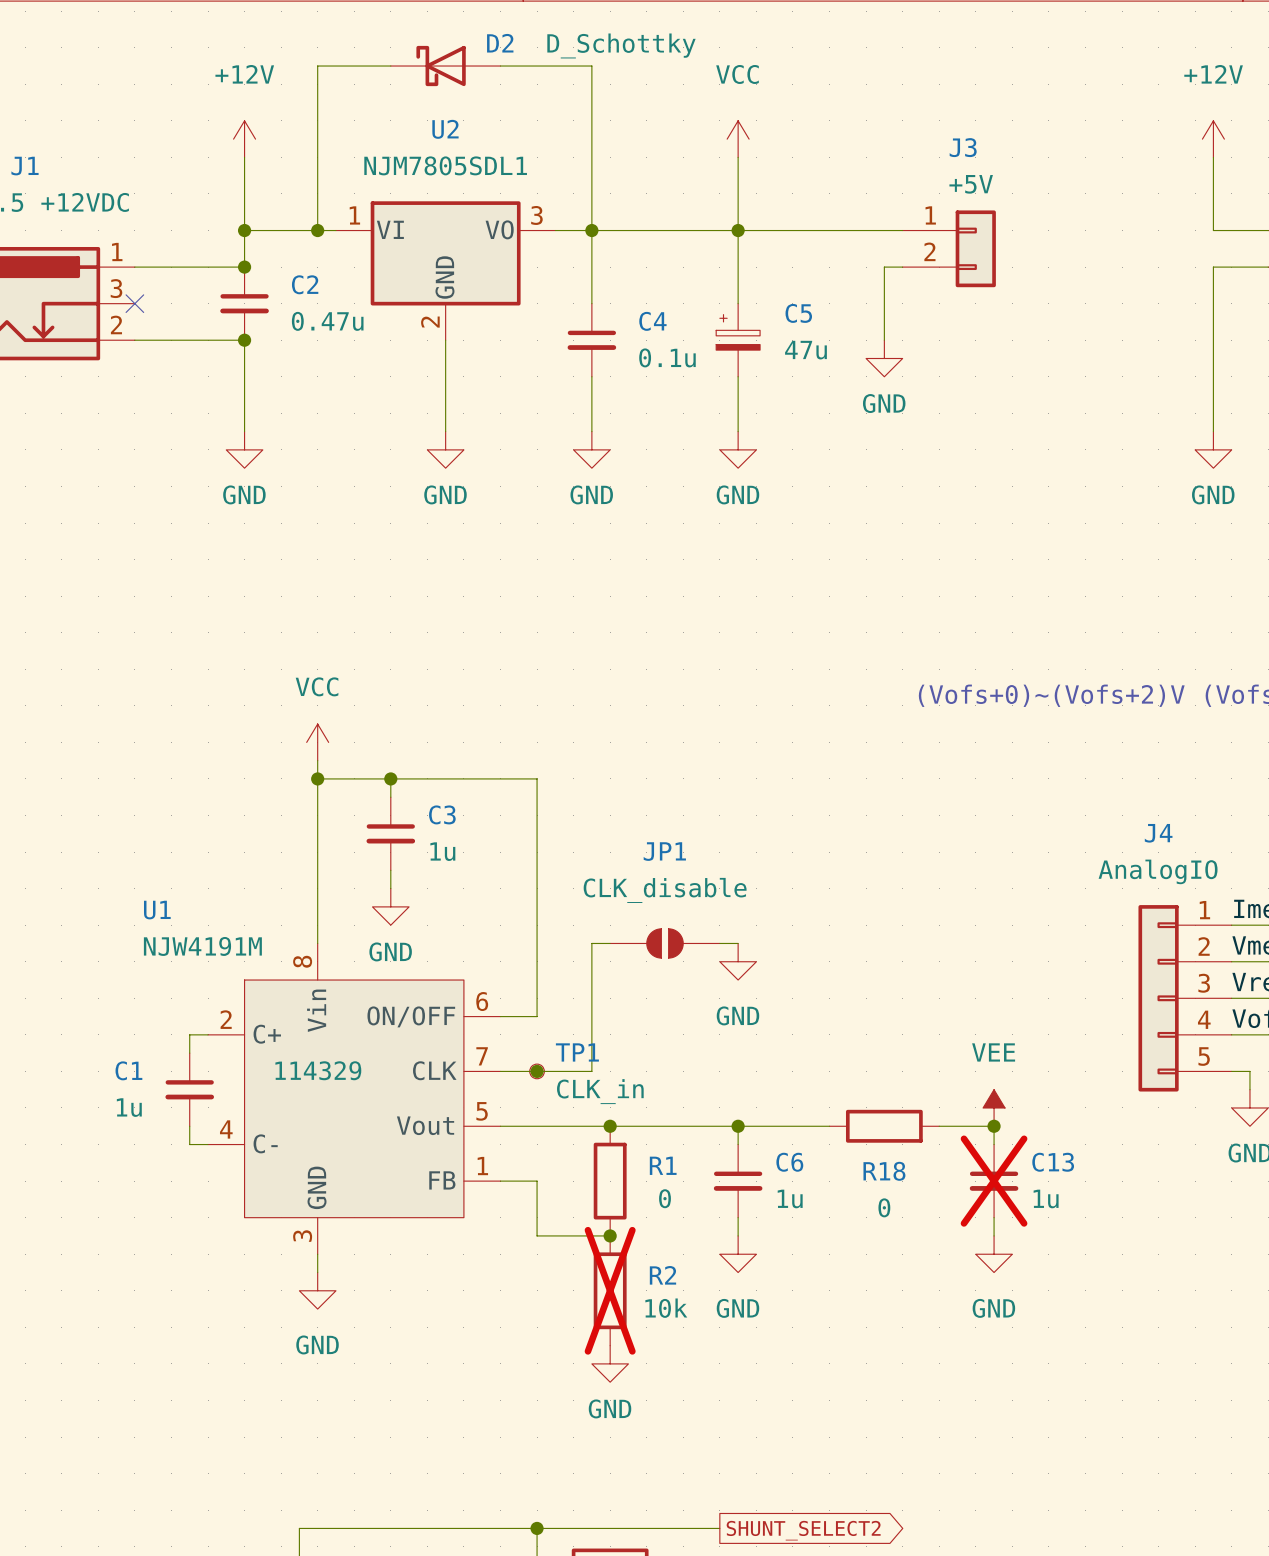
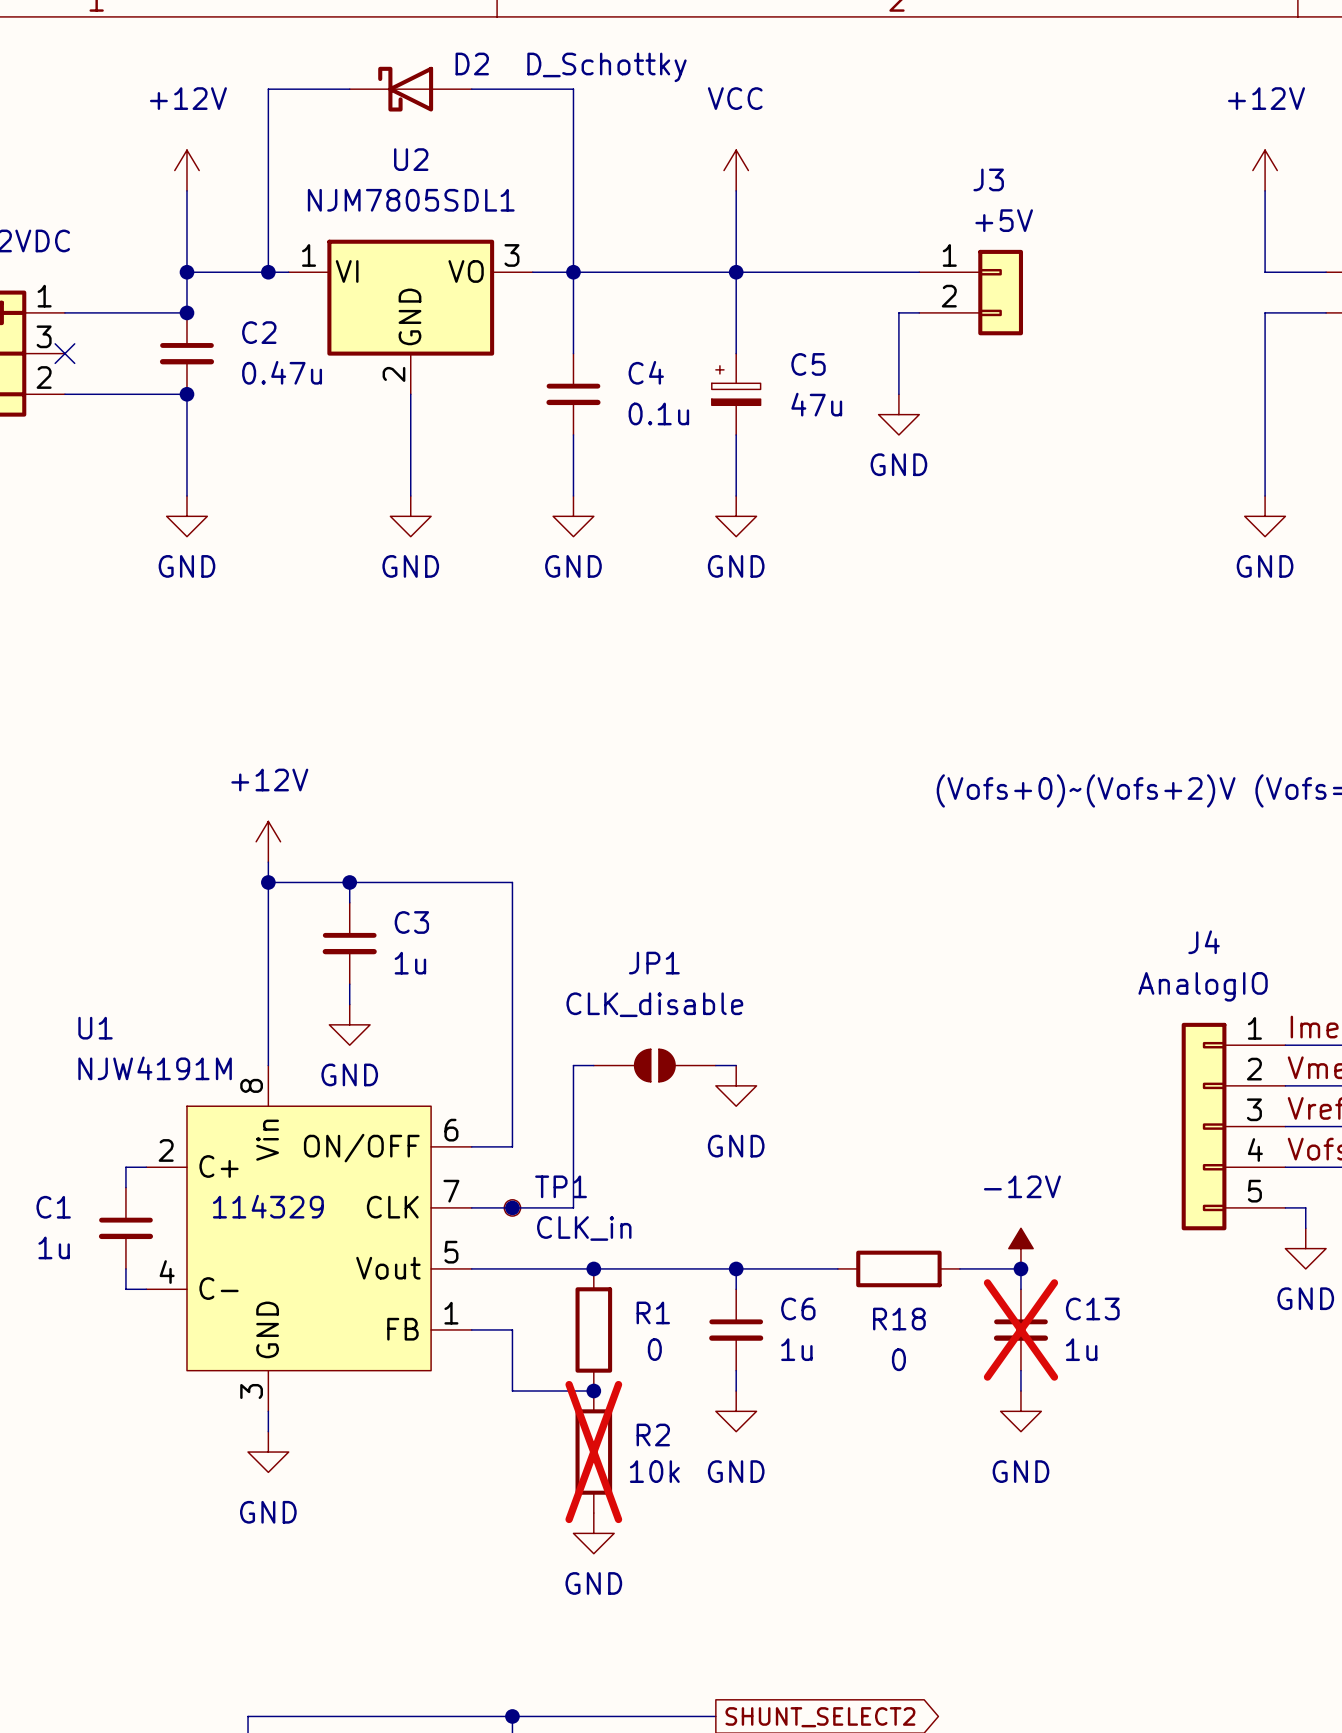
power symbol: VCC (317, 742) -> +12V (268, 841)
power symbol: VEE (994, 1107) -> -12V (1020, 1248)

